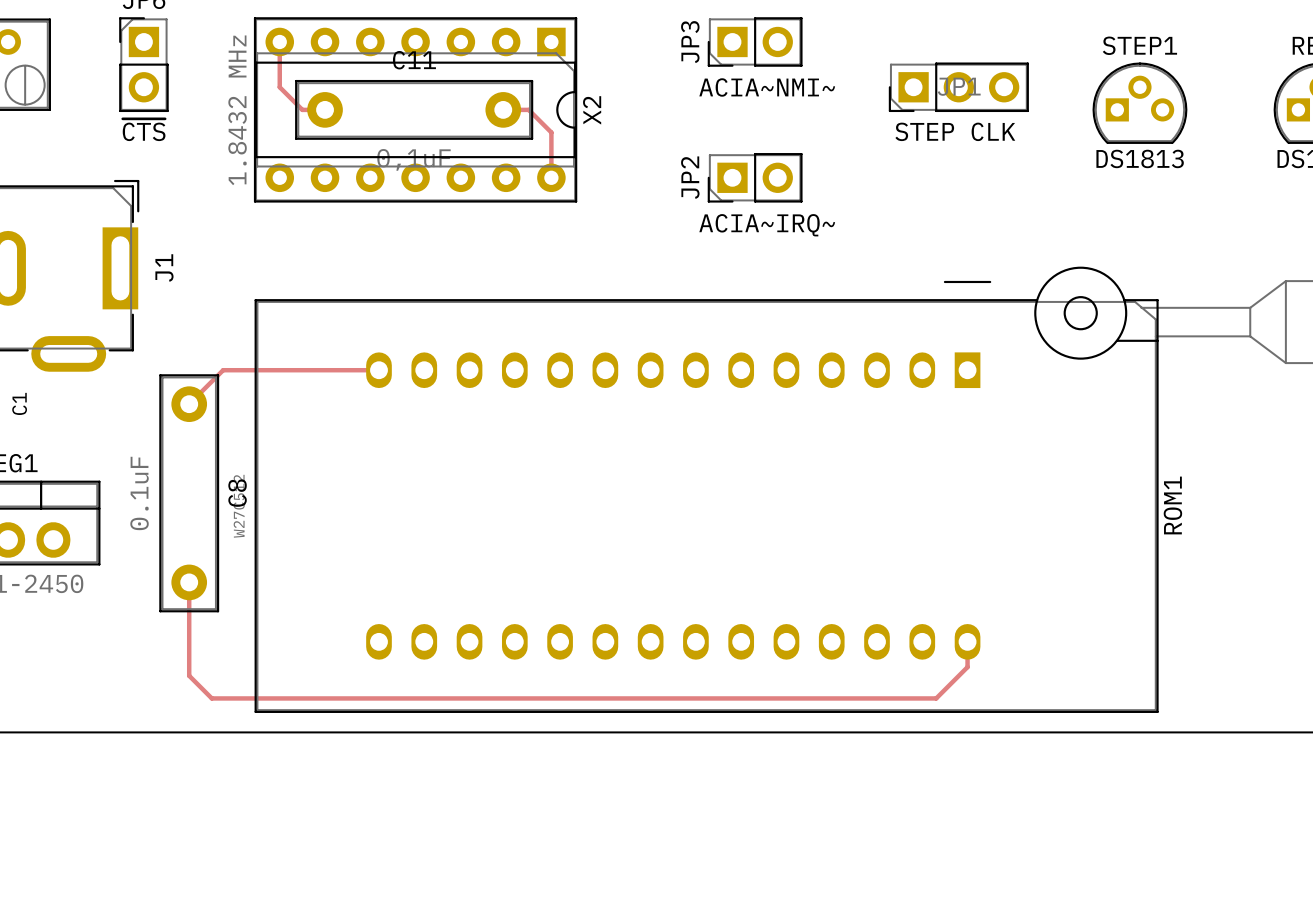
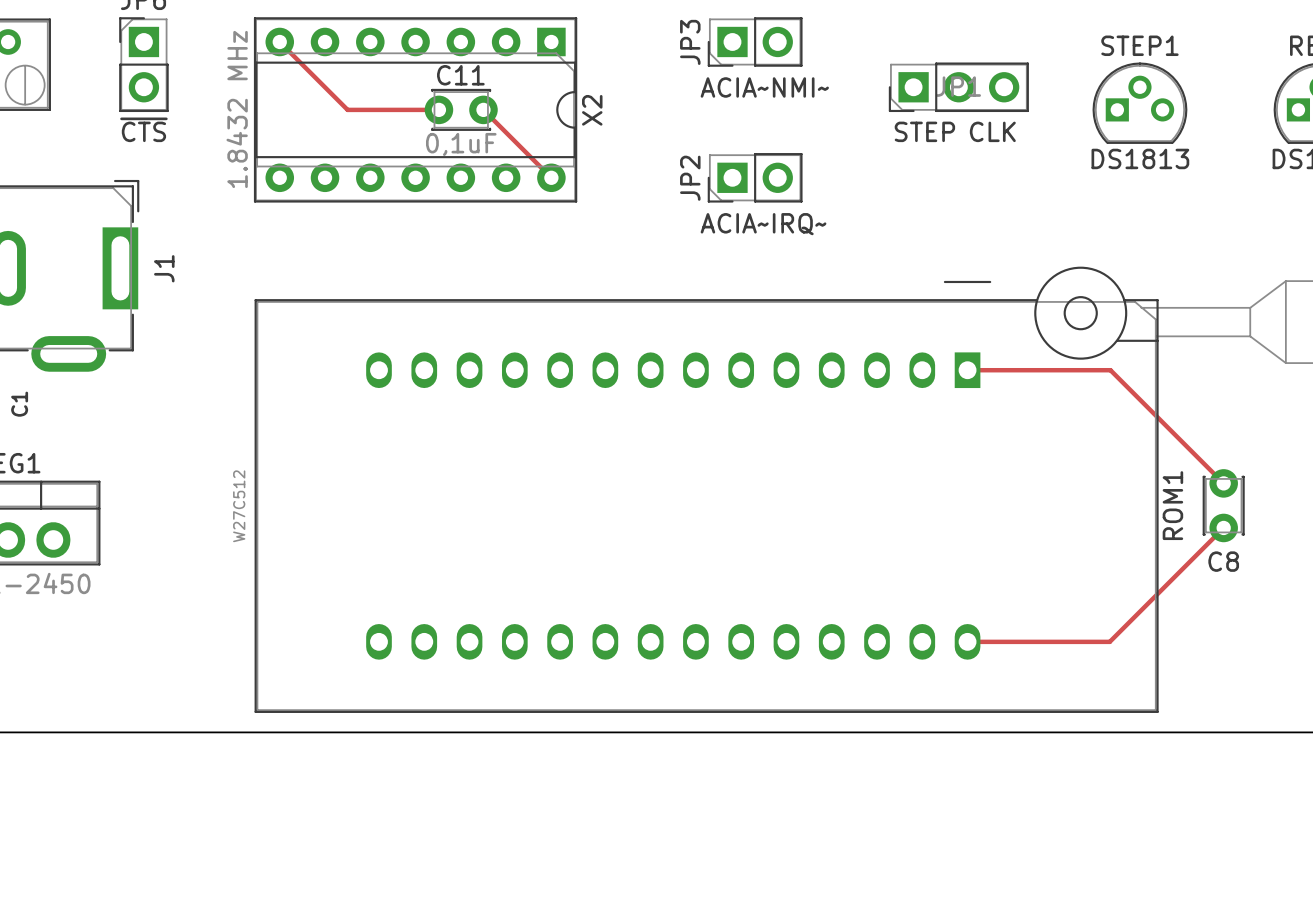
top track: (279, 41) (279, 87) (302, 109) (325, 109) -> (279, 41) (347, 109) (438, 109)
C11 footprint: [295, 79, 534, 140] -> [424, 88, 498, 131]
top track: (503, 109) (528, 109) (551, 132) (551, 177) -> (483, 109) (551, 177)
top track: (379, 370) (223, 370) (189, 404) -> none
top track: none -> (967, 370) (1110, 370) (1223, 483)
C8 footprint: [159, 374, 220, 613] -> [1202, 469, 1245, 543]
C8 value: 0.1uF (139, 493) -> none
C8 name position: C8 (237, 493) -> C8 (1223, 561)
top track: (189, 582) (189, 675) (211, 698) (936, 698) (967, 667) (967, 641) -> (1223, 527) (1109, 641) (967, 641)

